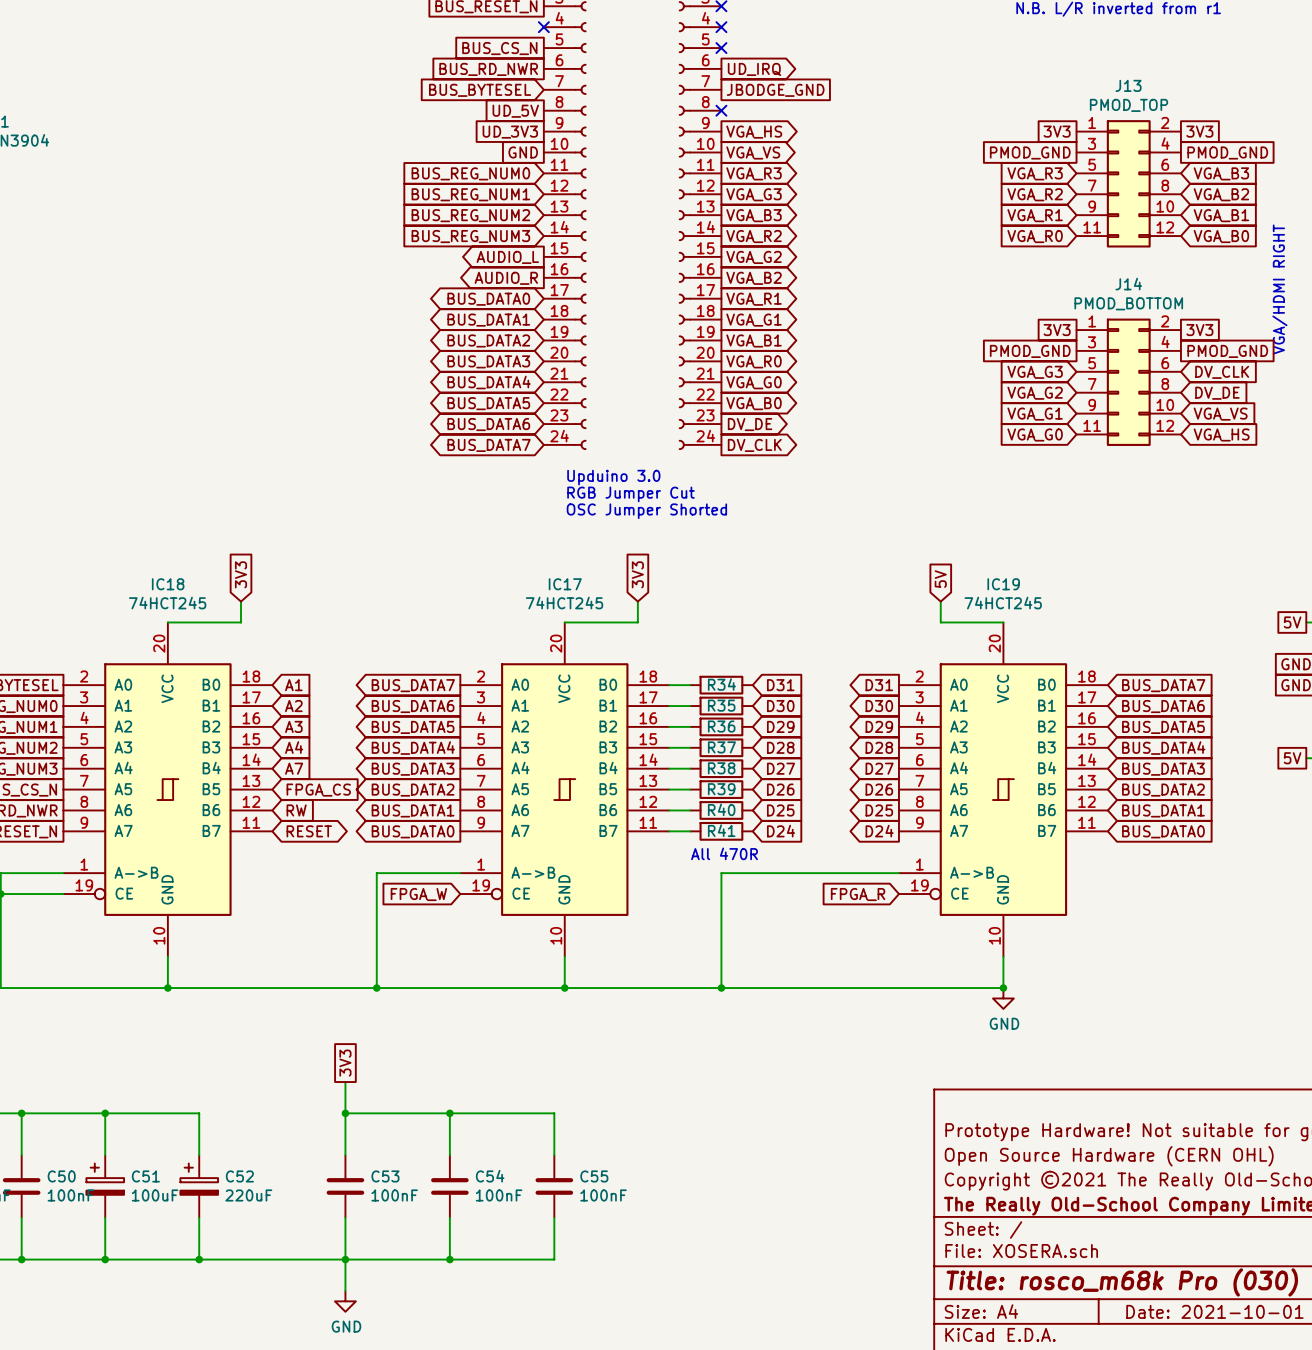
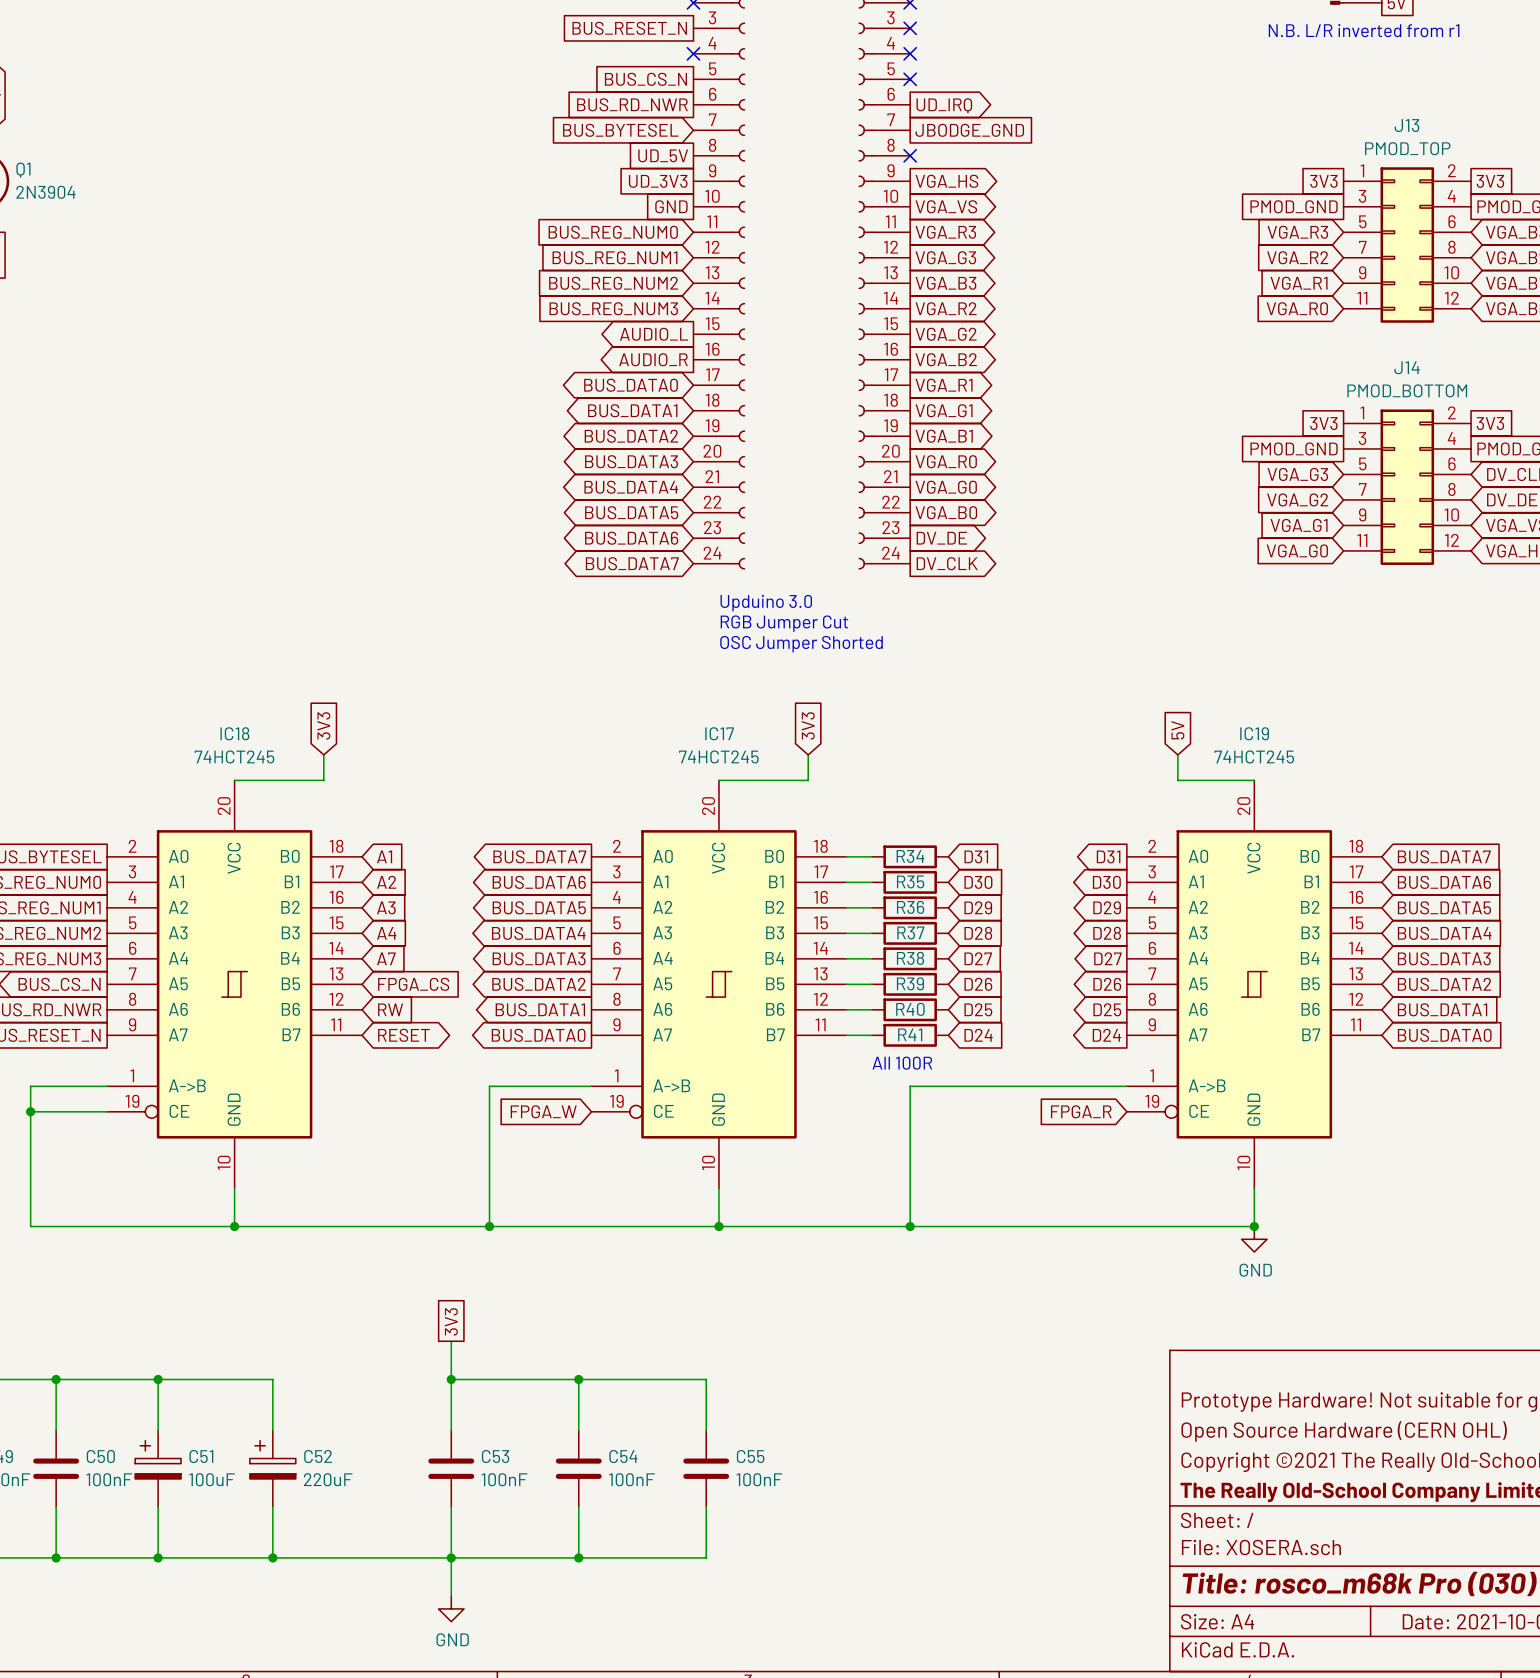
text: All 470R (724, 853) -> All 100R (902, 1063)

